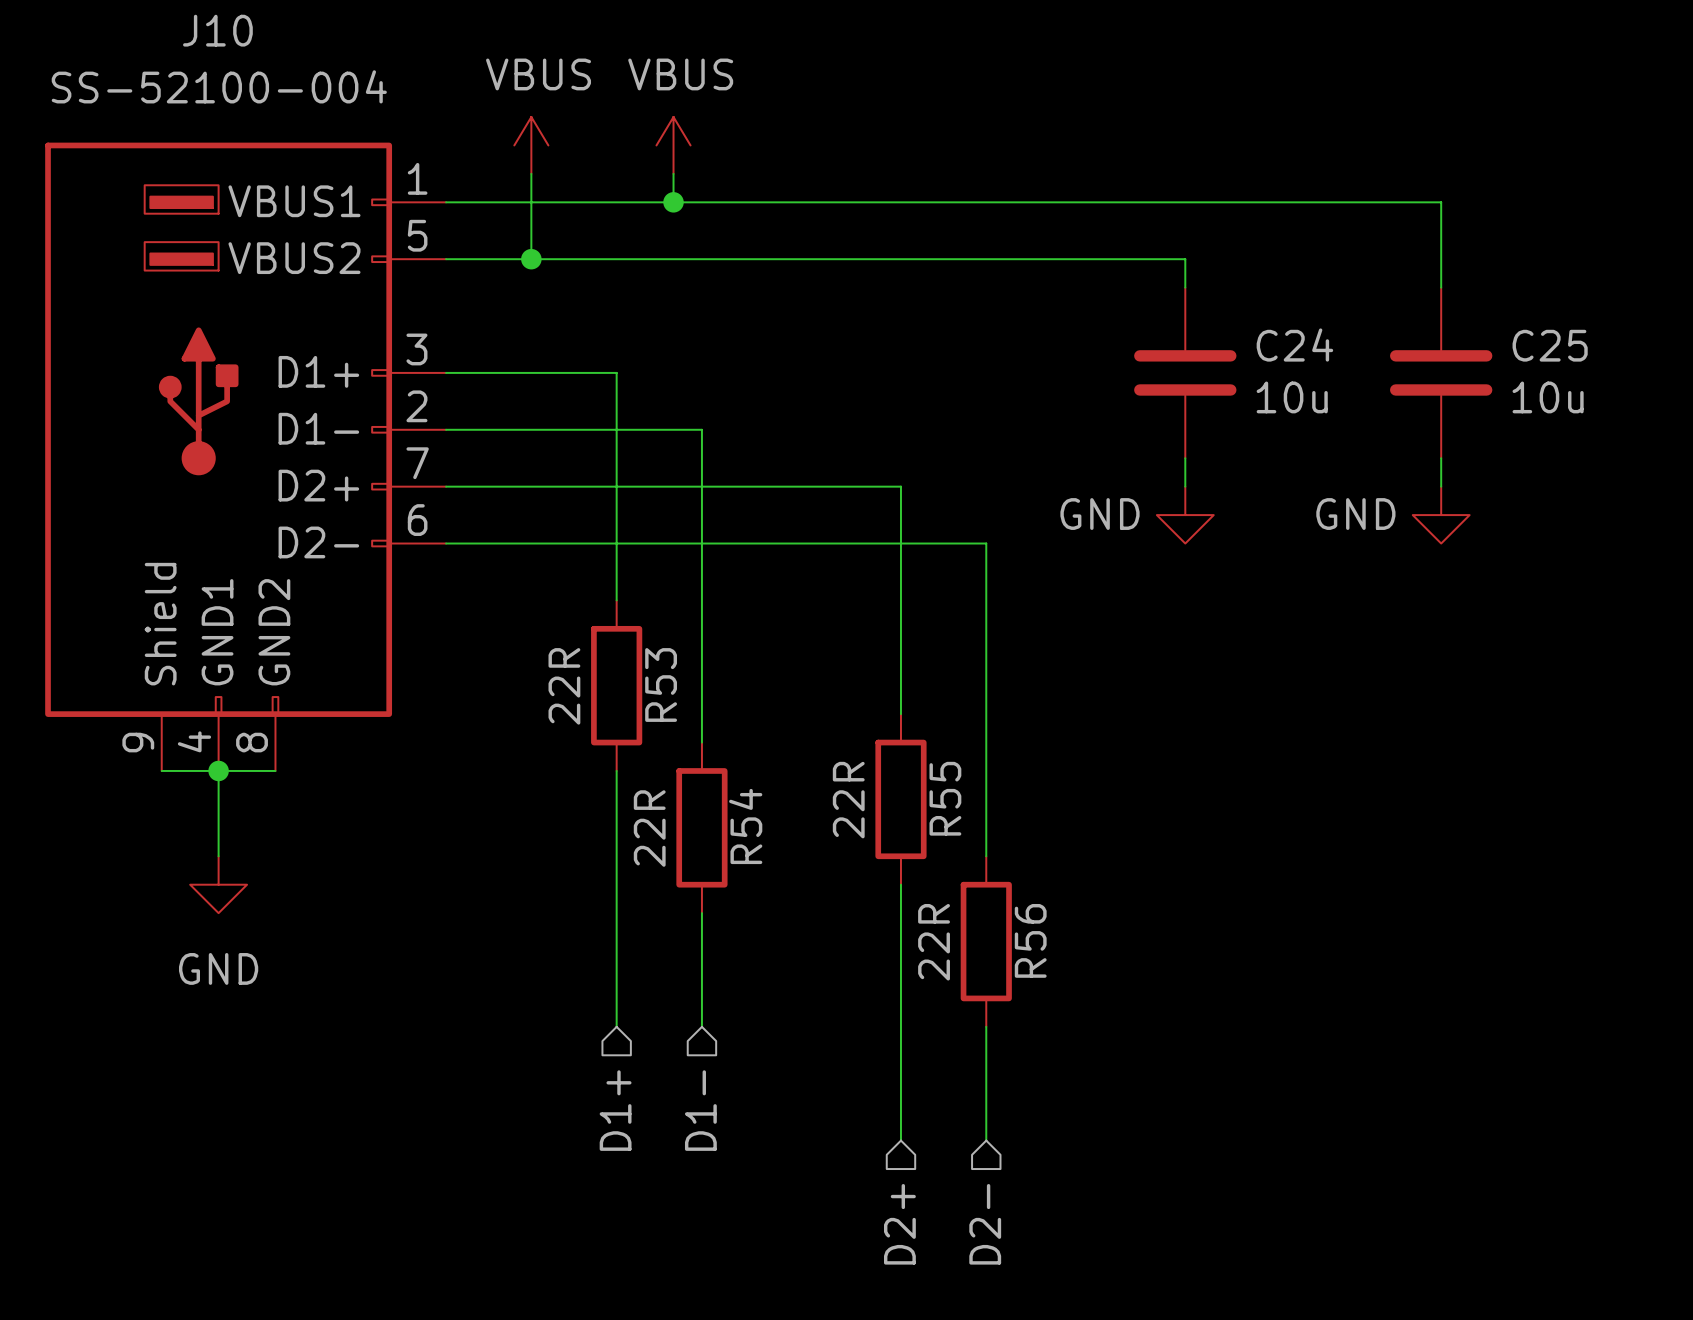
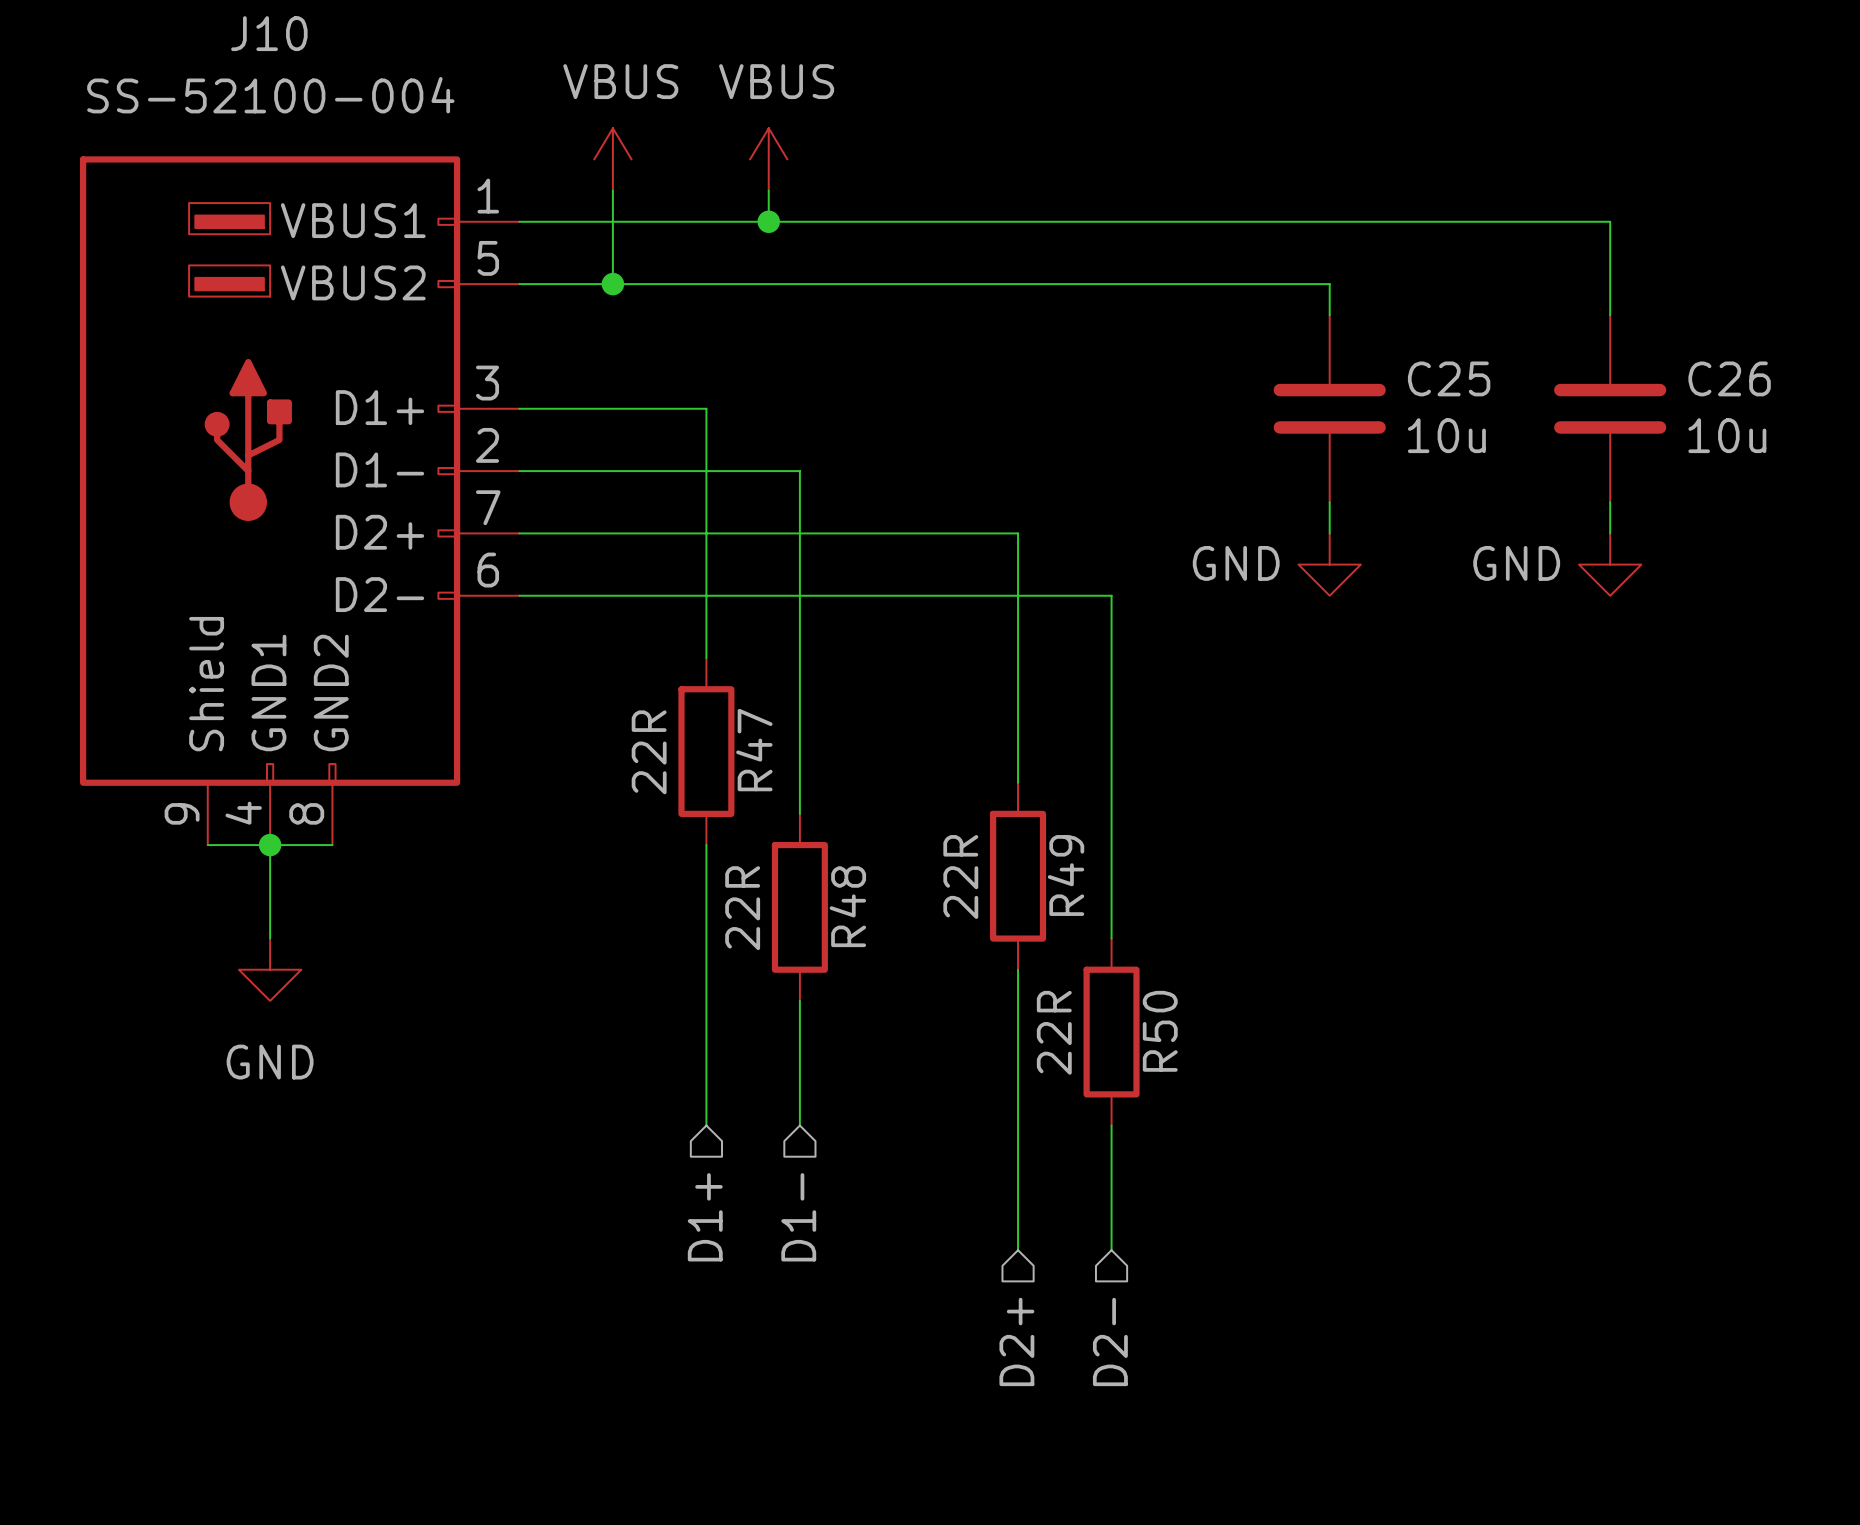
C24 name: C24 (1294, 345) -> C25 (1449, 378)
C25 name: C25 (1550, 345) -> C26 (1729, 378)
R53 name: R53 (661, 685) -> R47 (754, 750)
R55 name: R55 (945, 798) -> R49 (1066, 875)
R54 name: R54 (745, 826) -> R48 (847, 906)
R56 name: R56 (1030, 940) -> R50 (1160, 1031)

